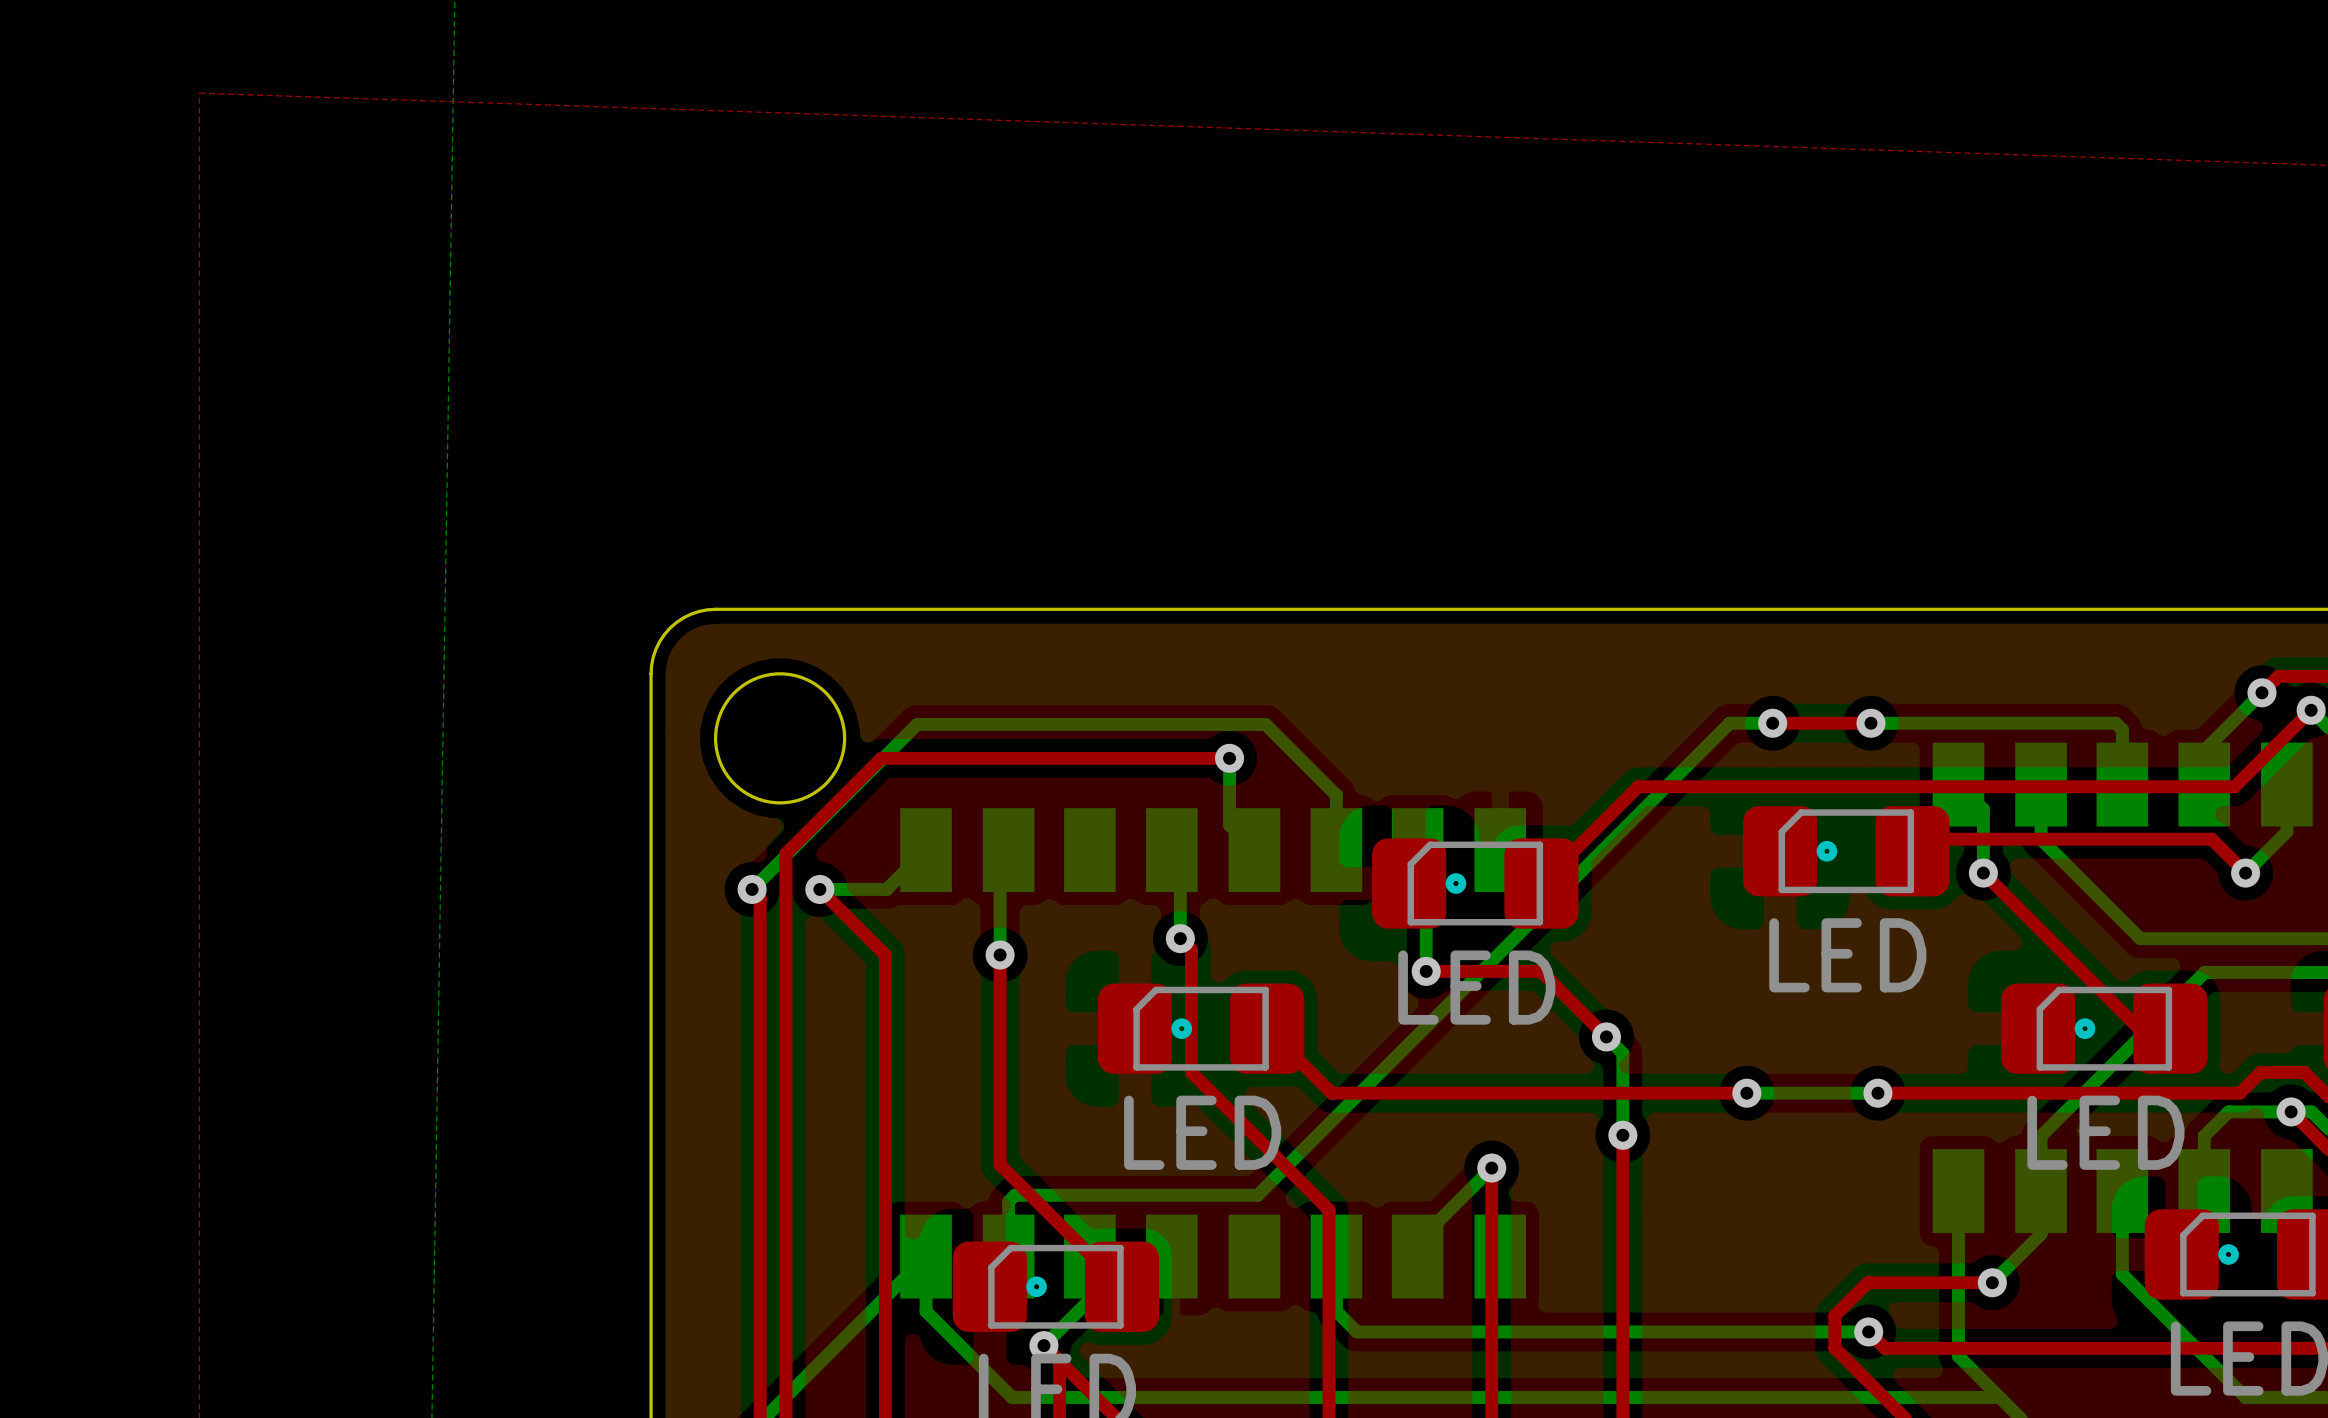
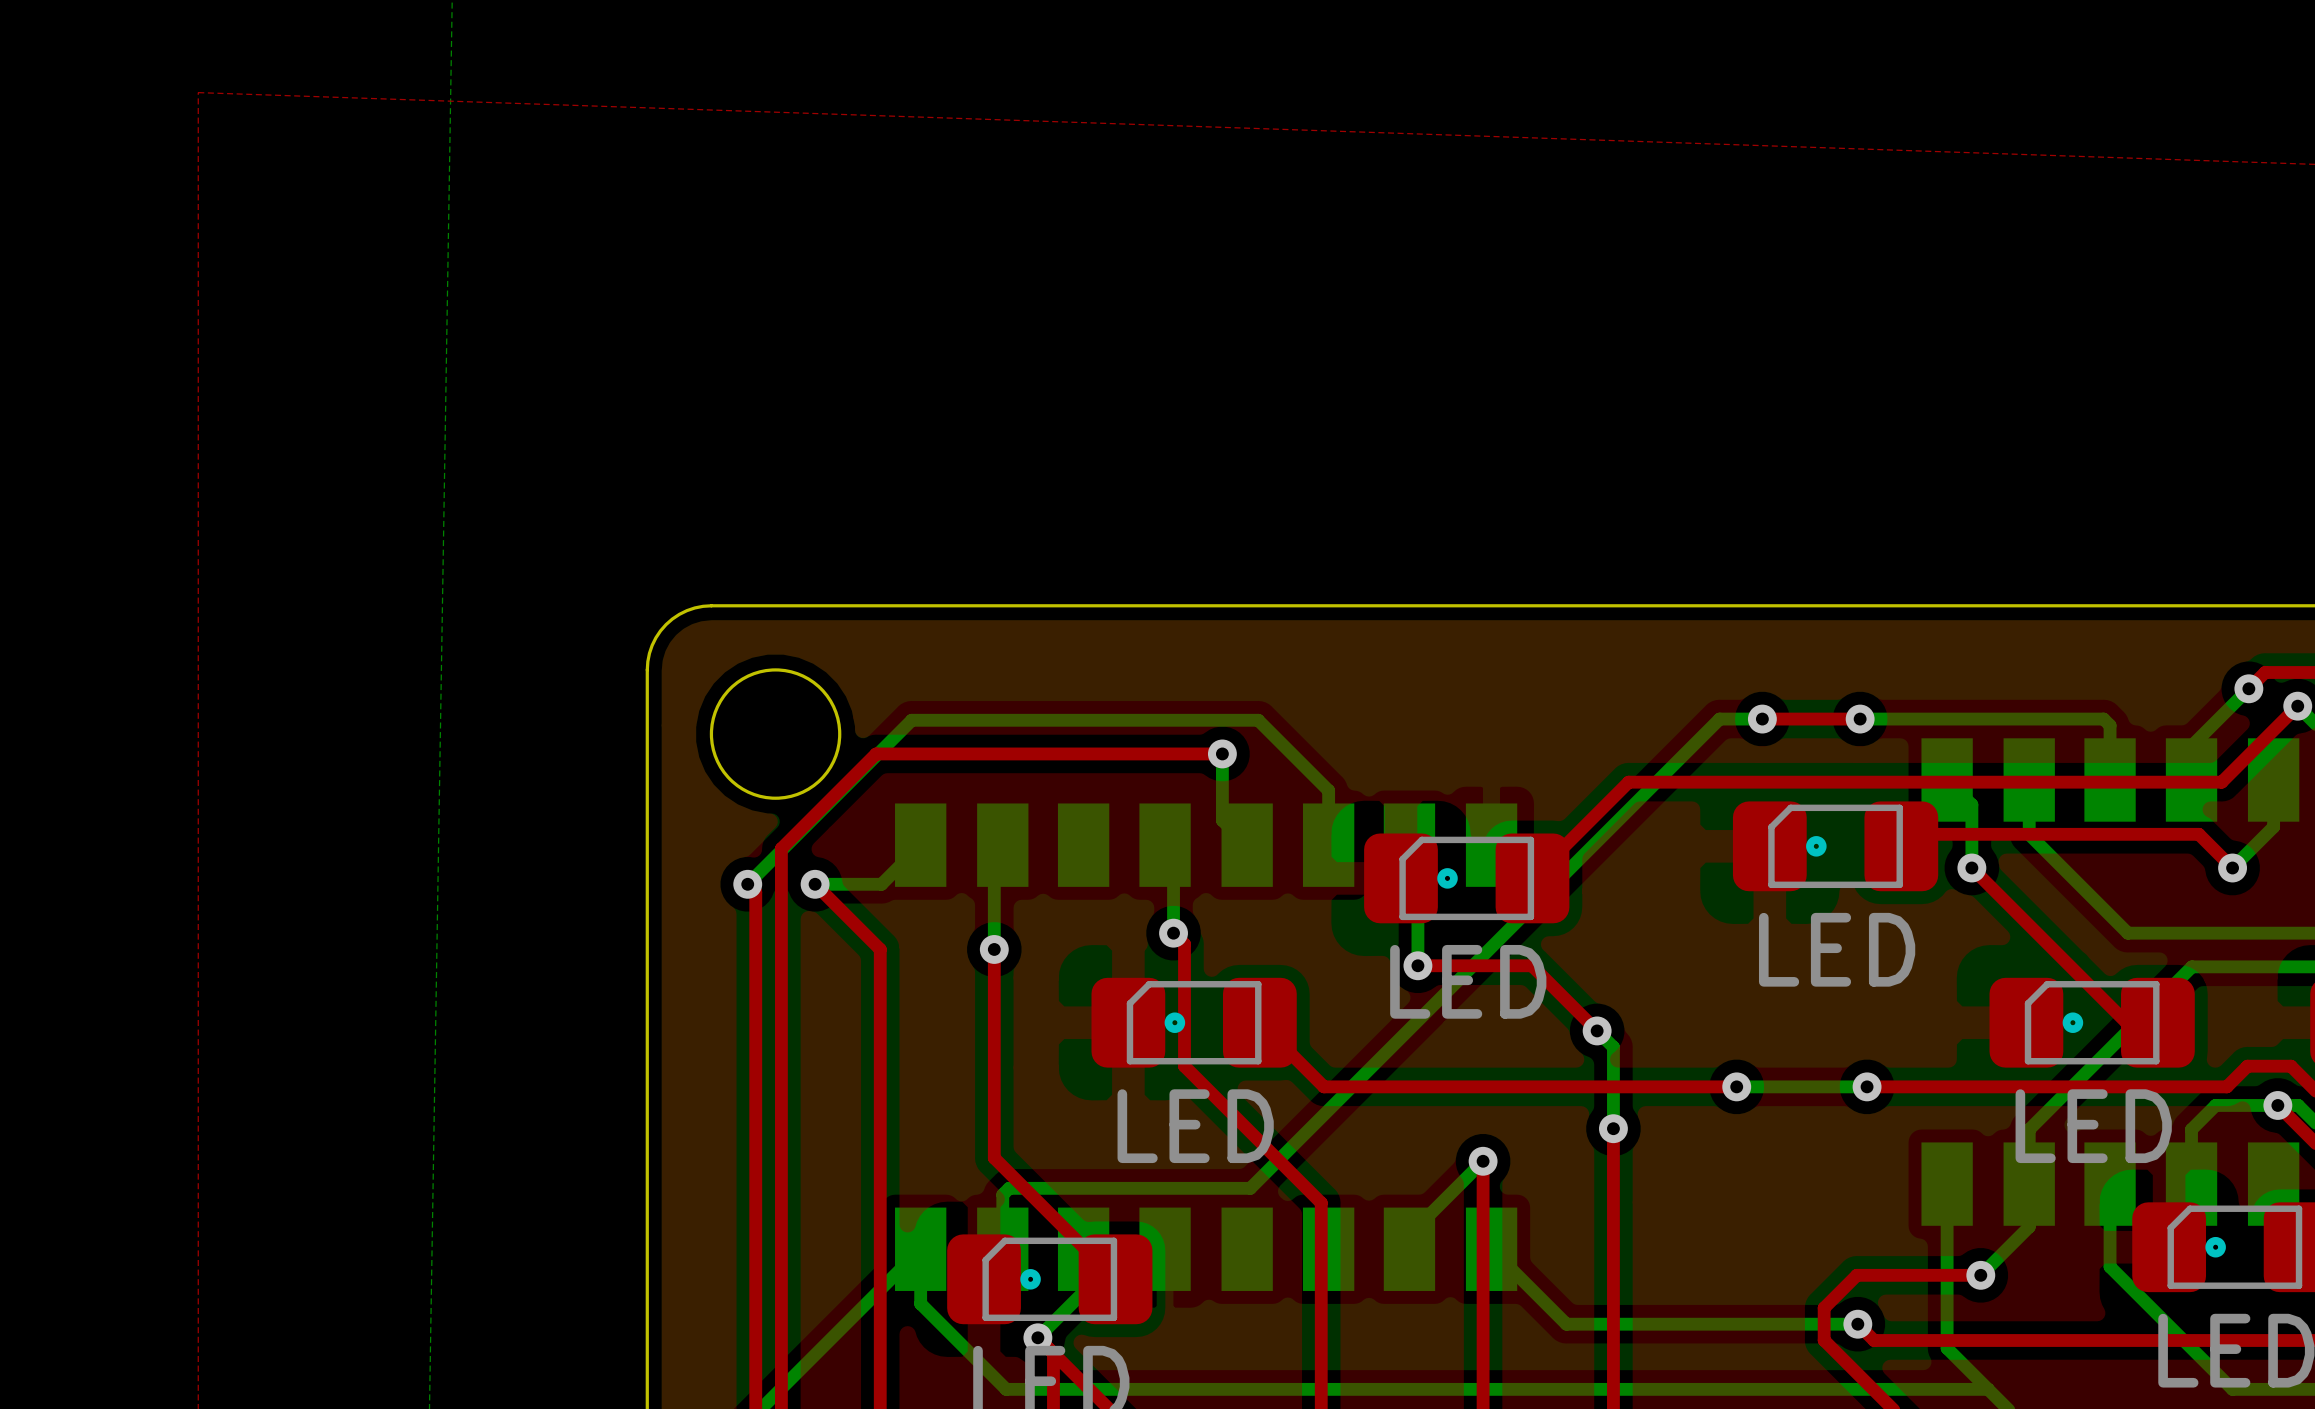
bottom track: (1336, 1256) (1336, 1311) (1356, 1331) (1575, 1331) -> (1491, 1249) (1566, 1324)

